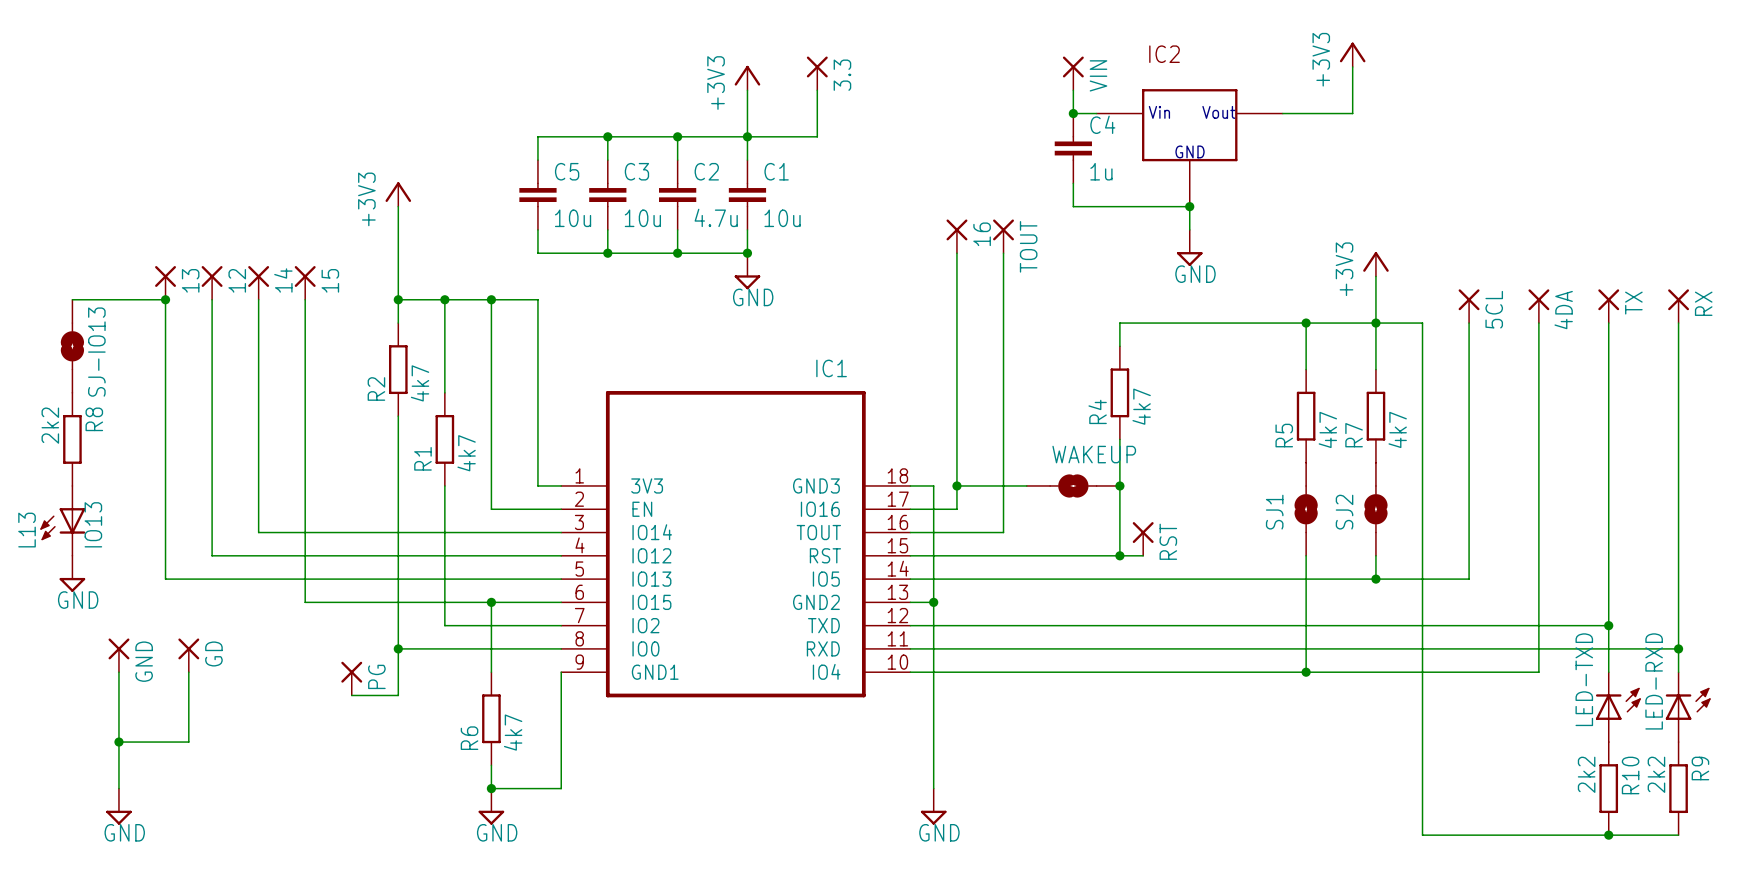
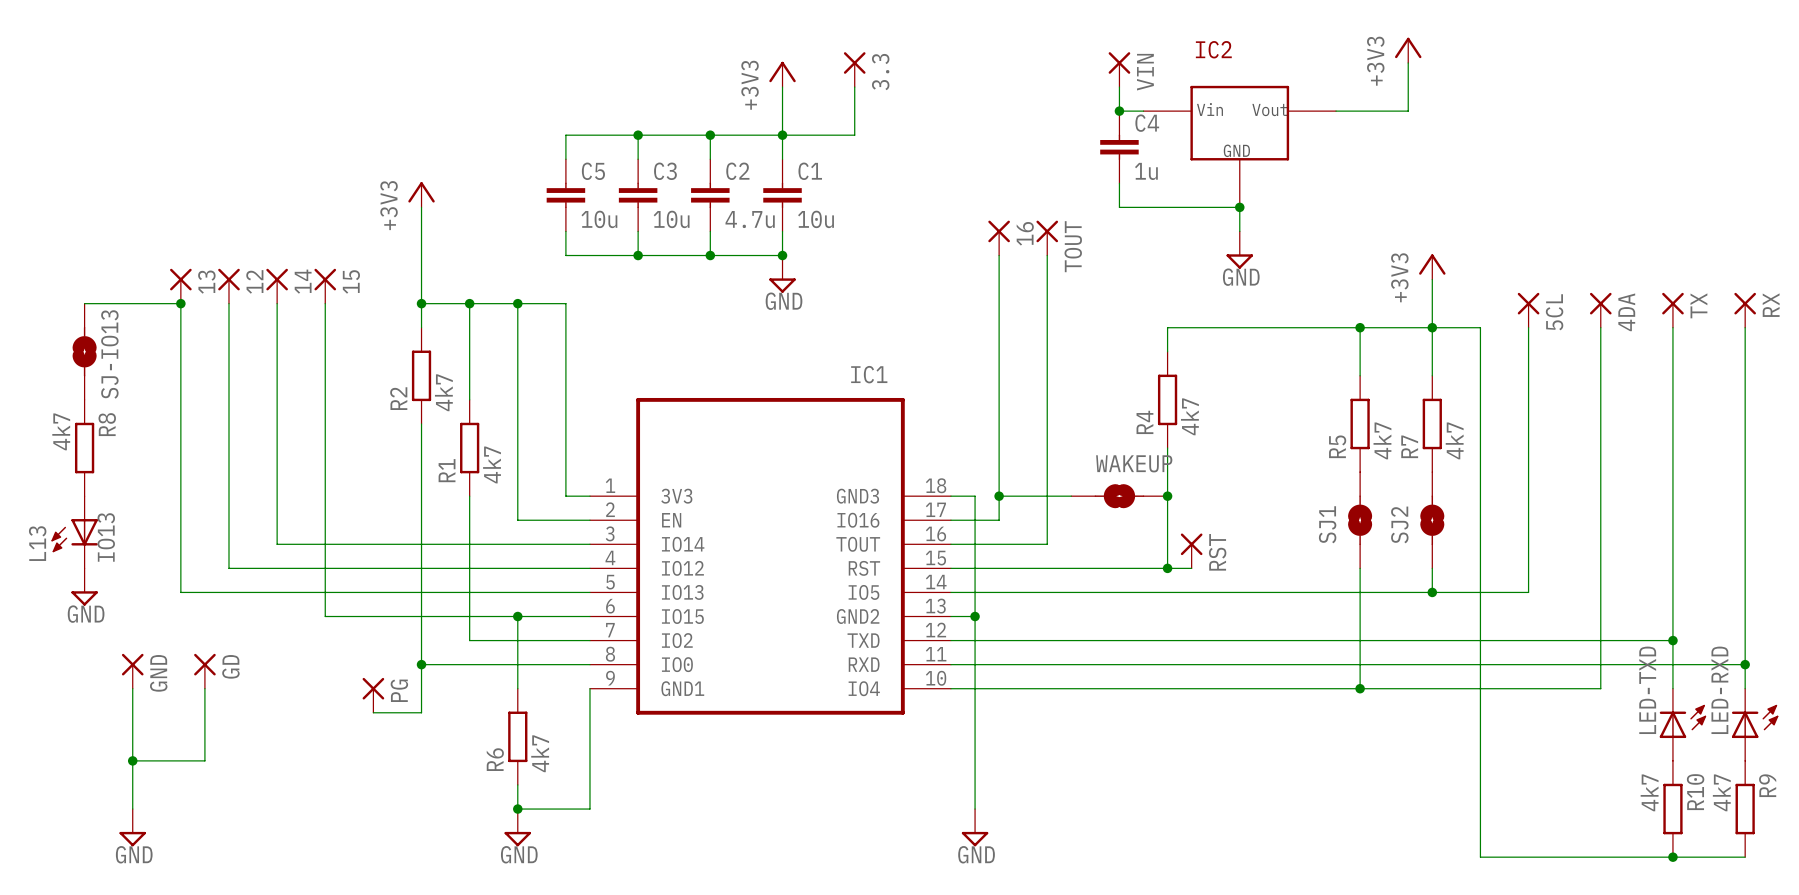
R8 value: 2k2 (50, 425) -> 4k7 (61, 431)
R10 value: 2k2 (1586, 774) -> 4k7 (1649, 792)
R9 value: 2k2 (1656, 774) -> 4k7 (1721, 792)

